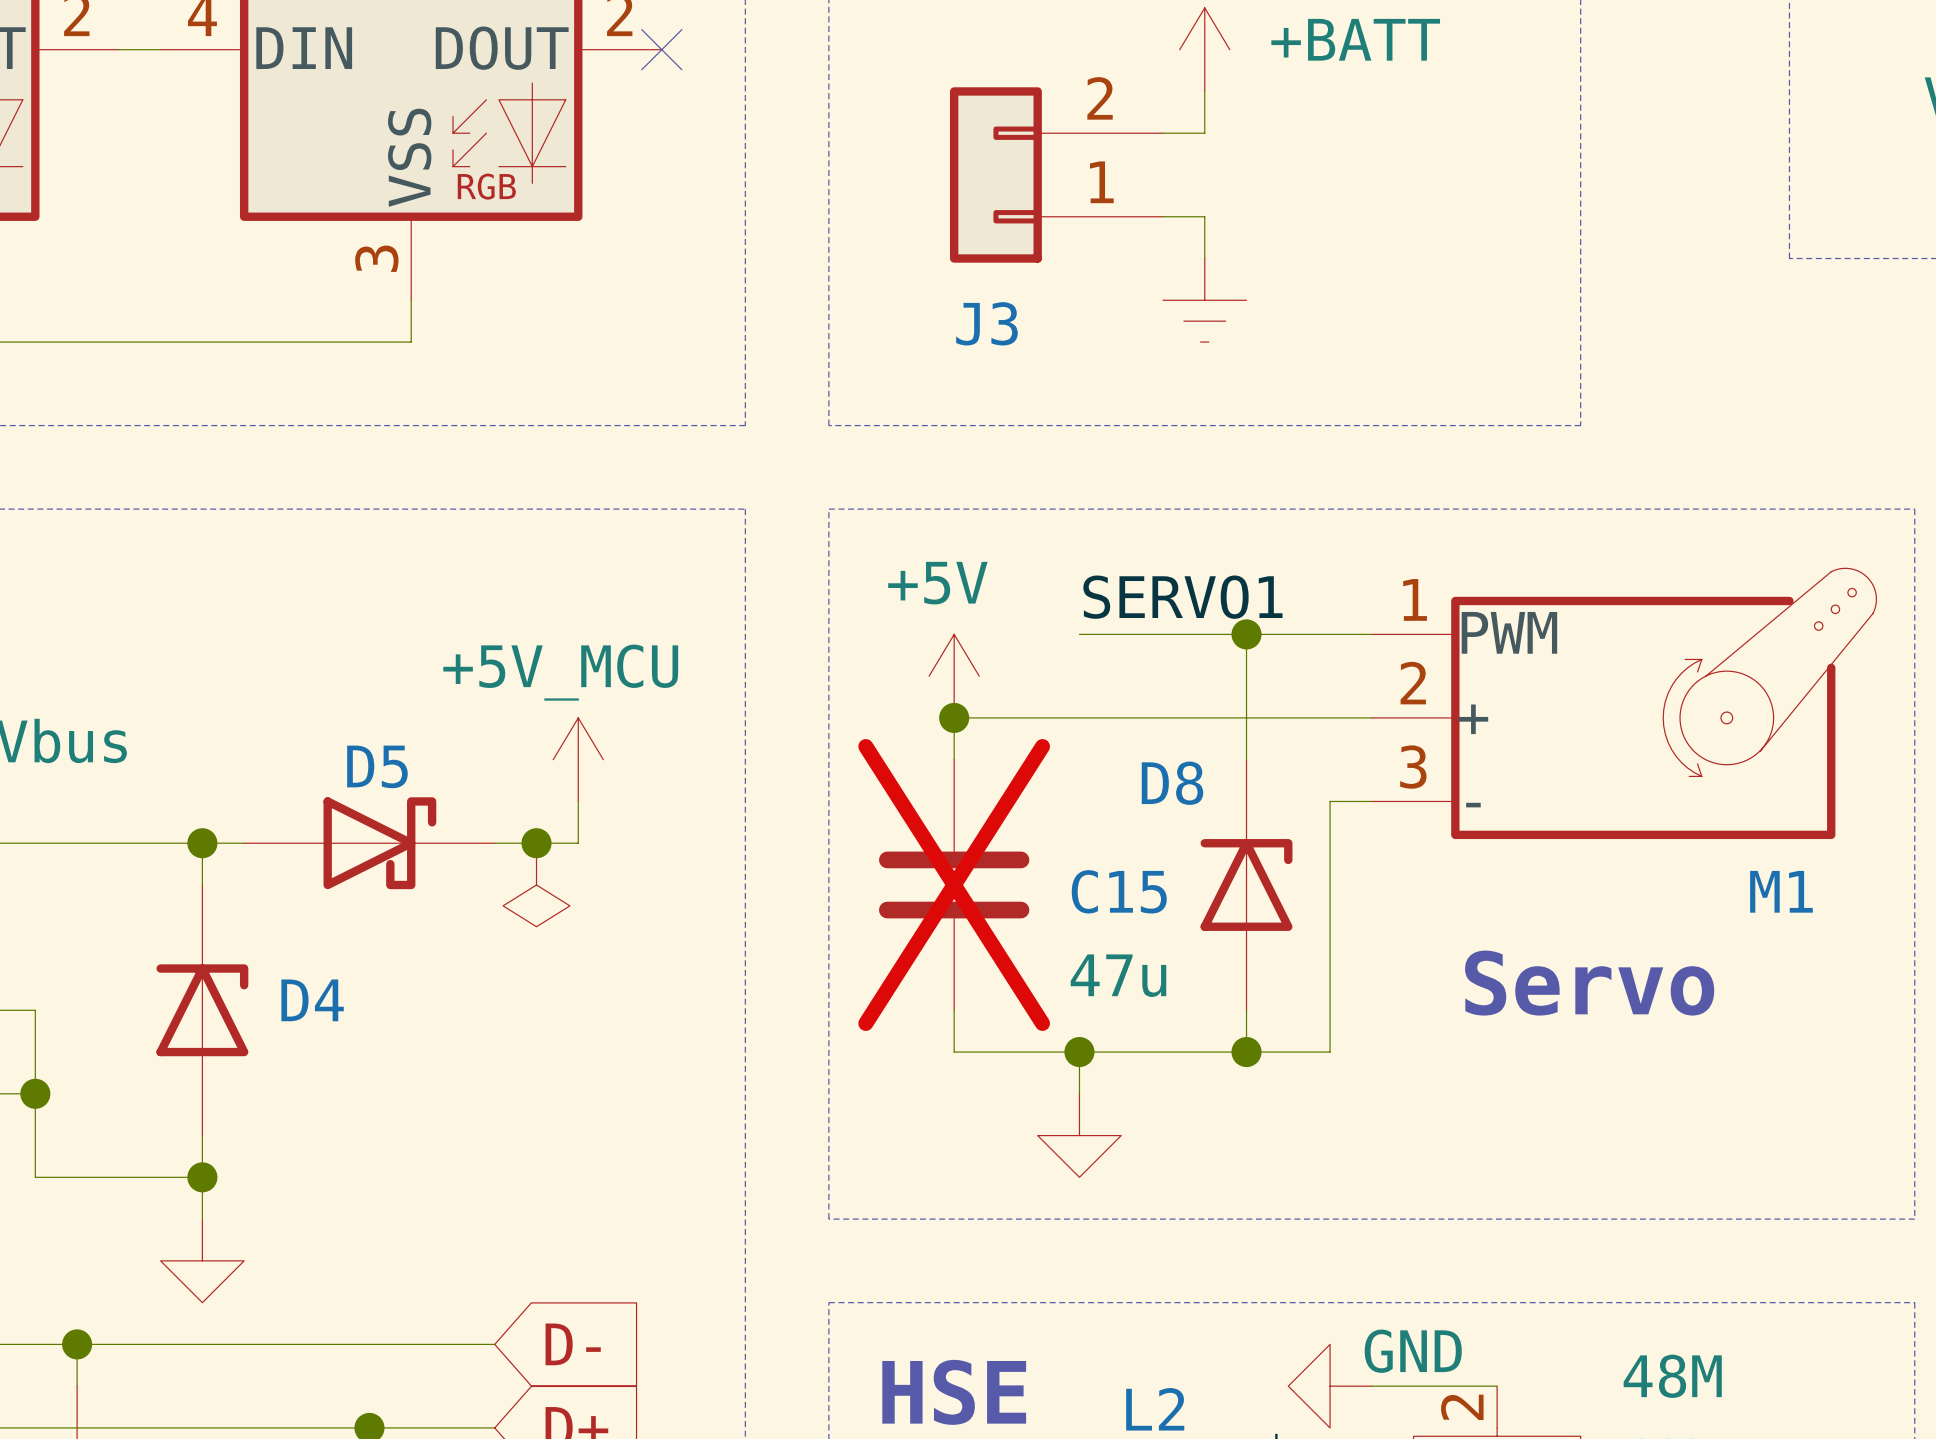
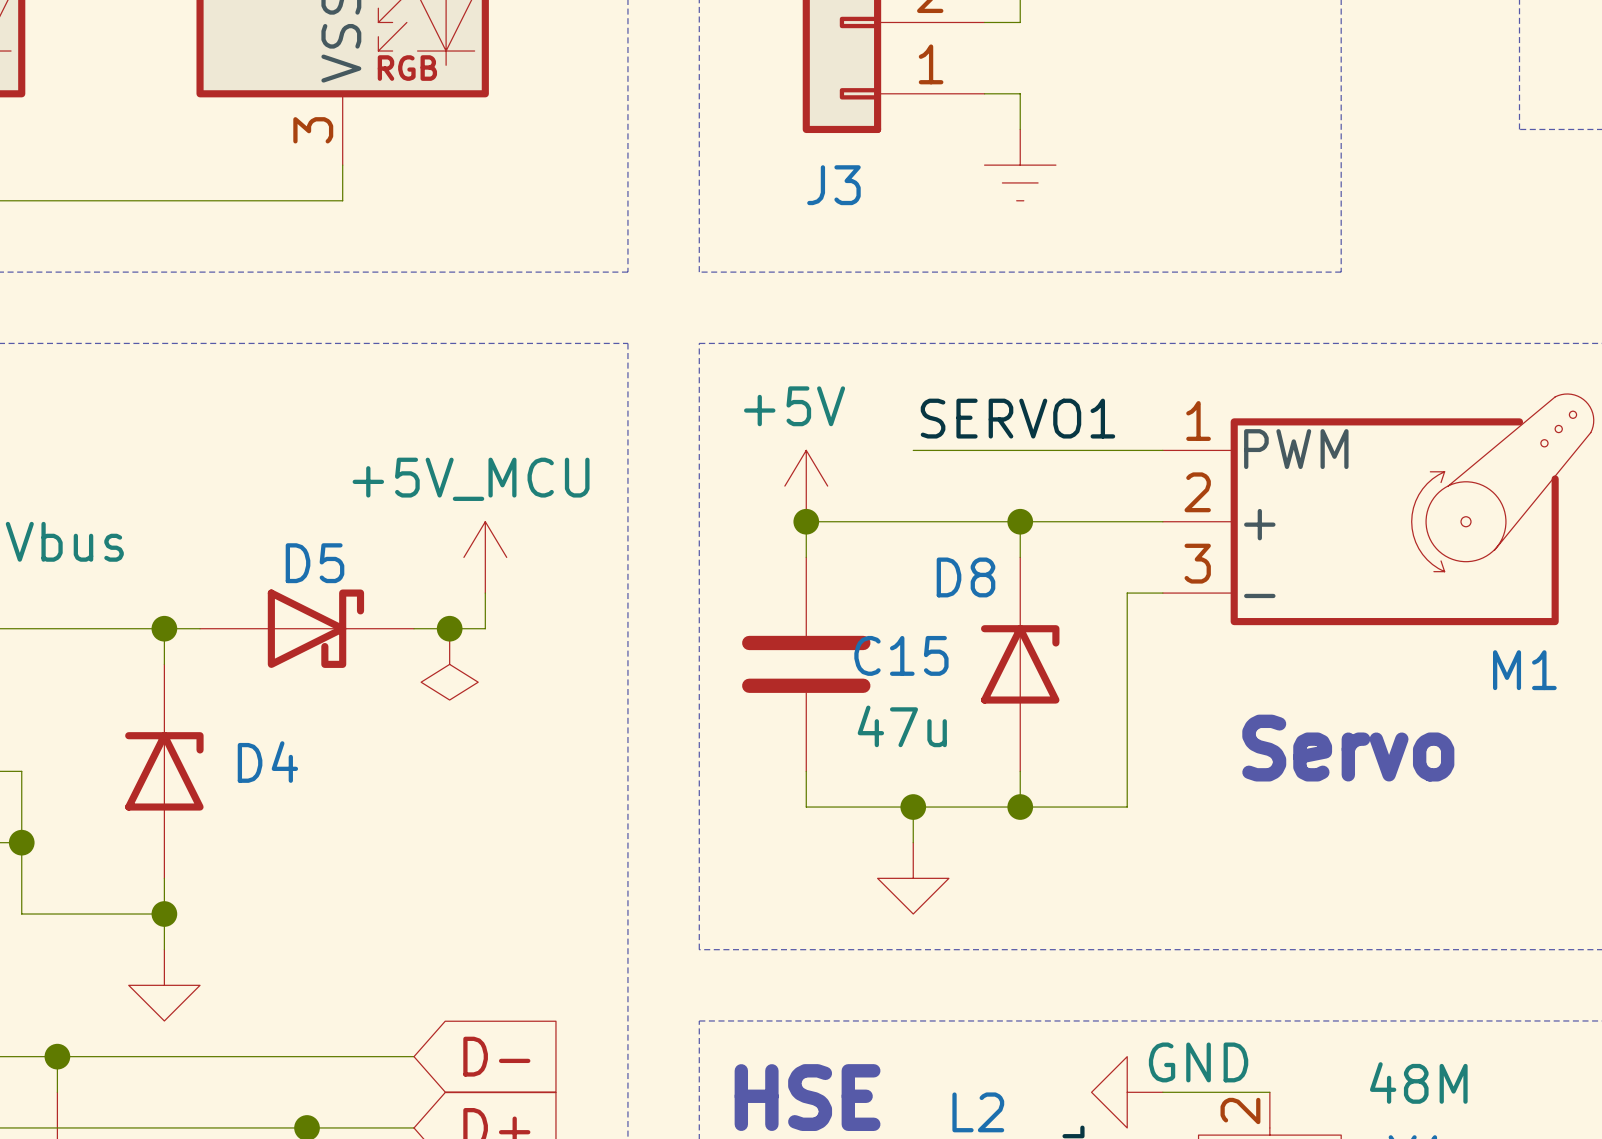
wire: (1246, 634) (1246, 759) -> none
junction position: (1246, 634) -> (1020, 521)
wire: none -> (1020, 521) (1020, 557)
C15 do-not-place cross: (954, 884) -> none
D8 position: (1246, 884) -> (1020, 664)
C15 name position: C15 (1119, 891) -> C15 (901, 655)
C15 value position: 47u (1118, 975) -> 47u (902, 726)
wire: (1246, 1010) (1246, 1052) -> (1020, 771) (1020, 807)
junction position: (1246, 1052) -> (1020, 807)

